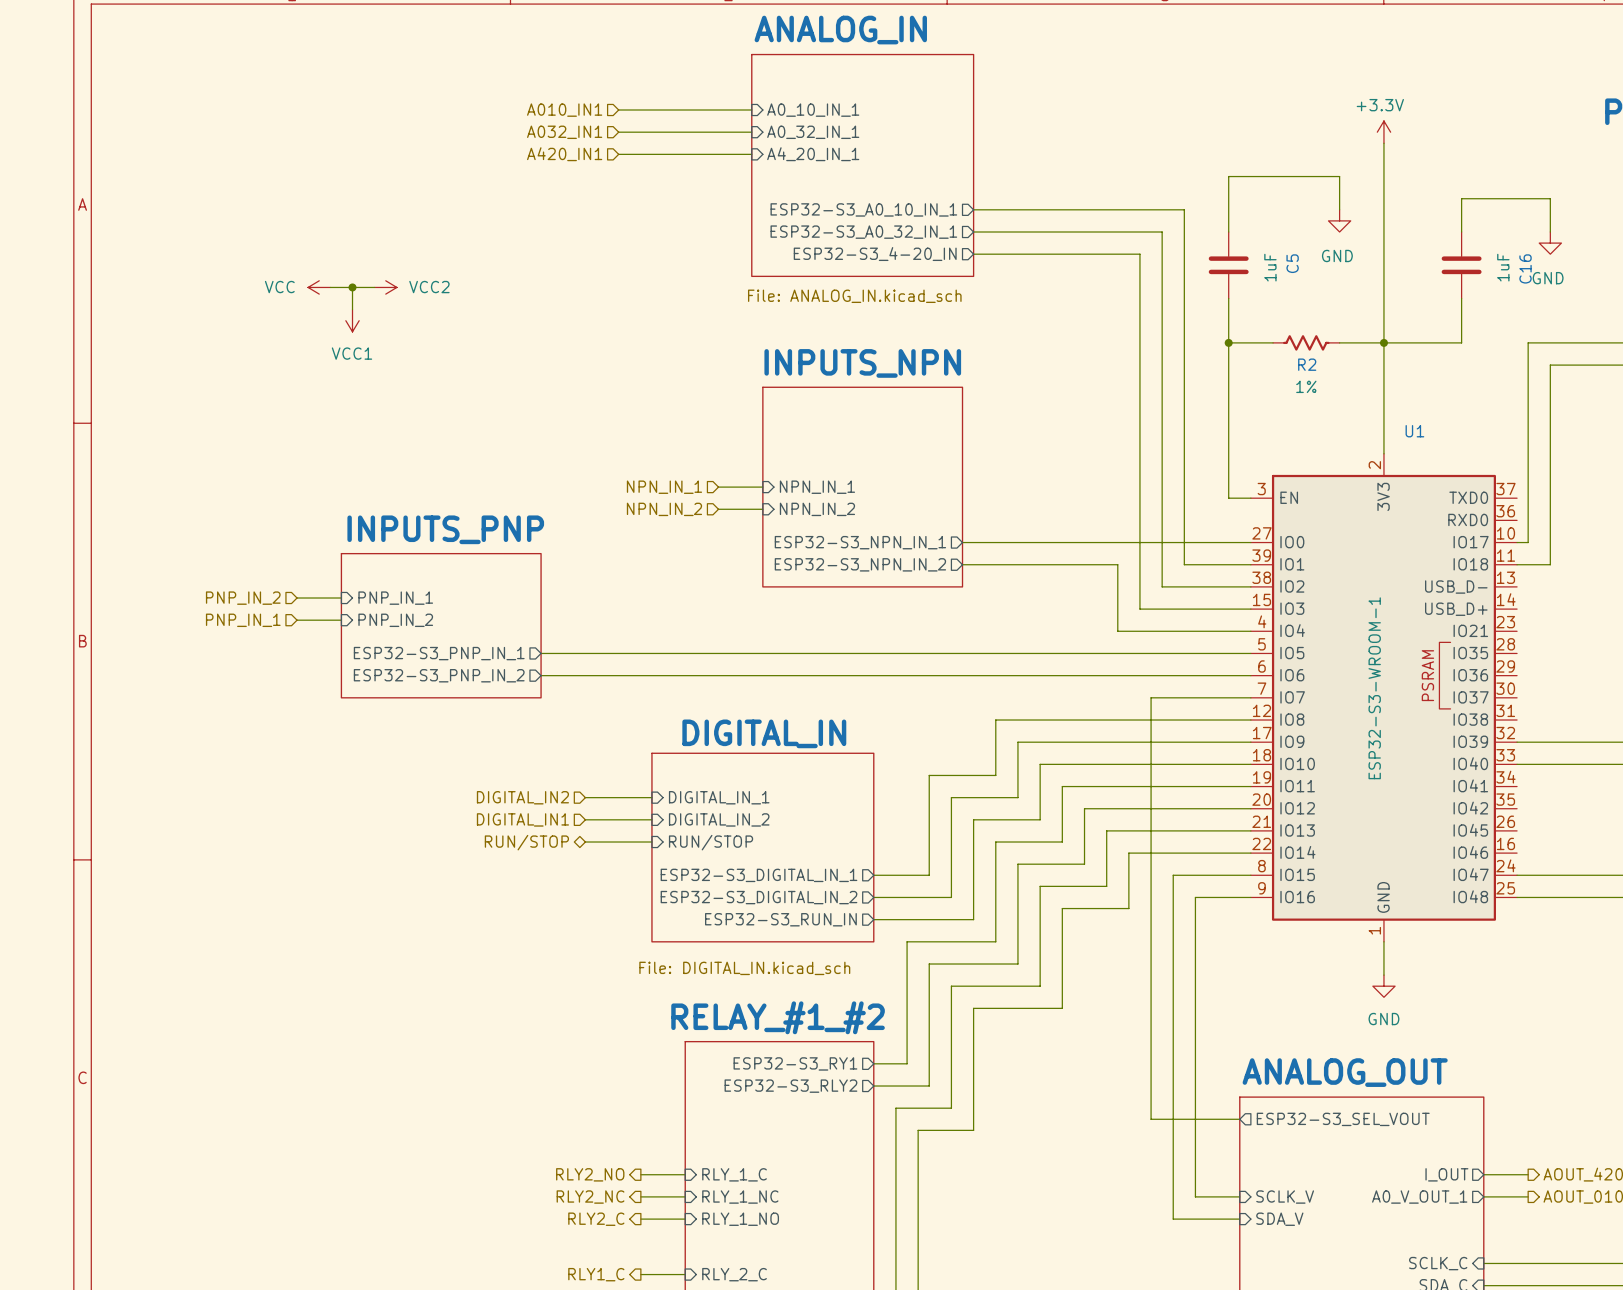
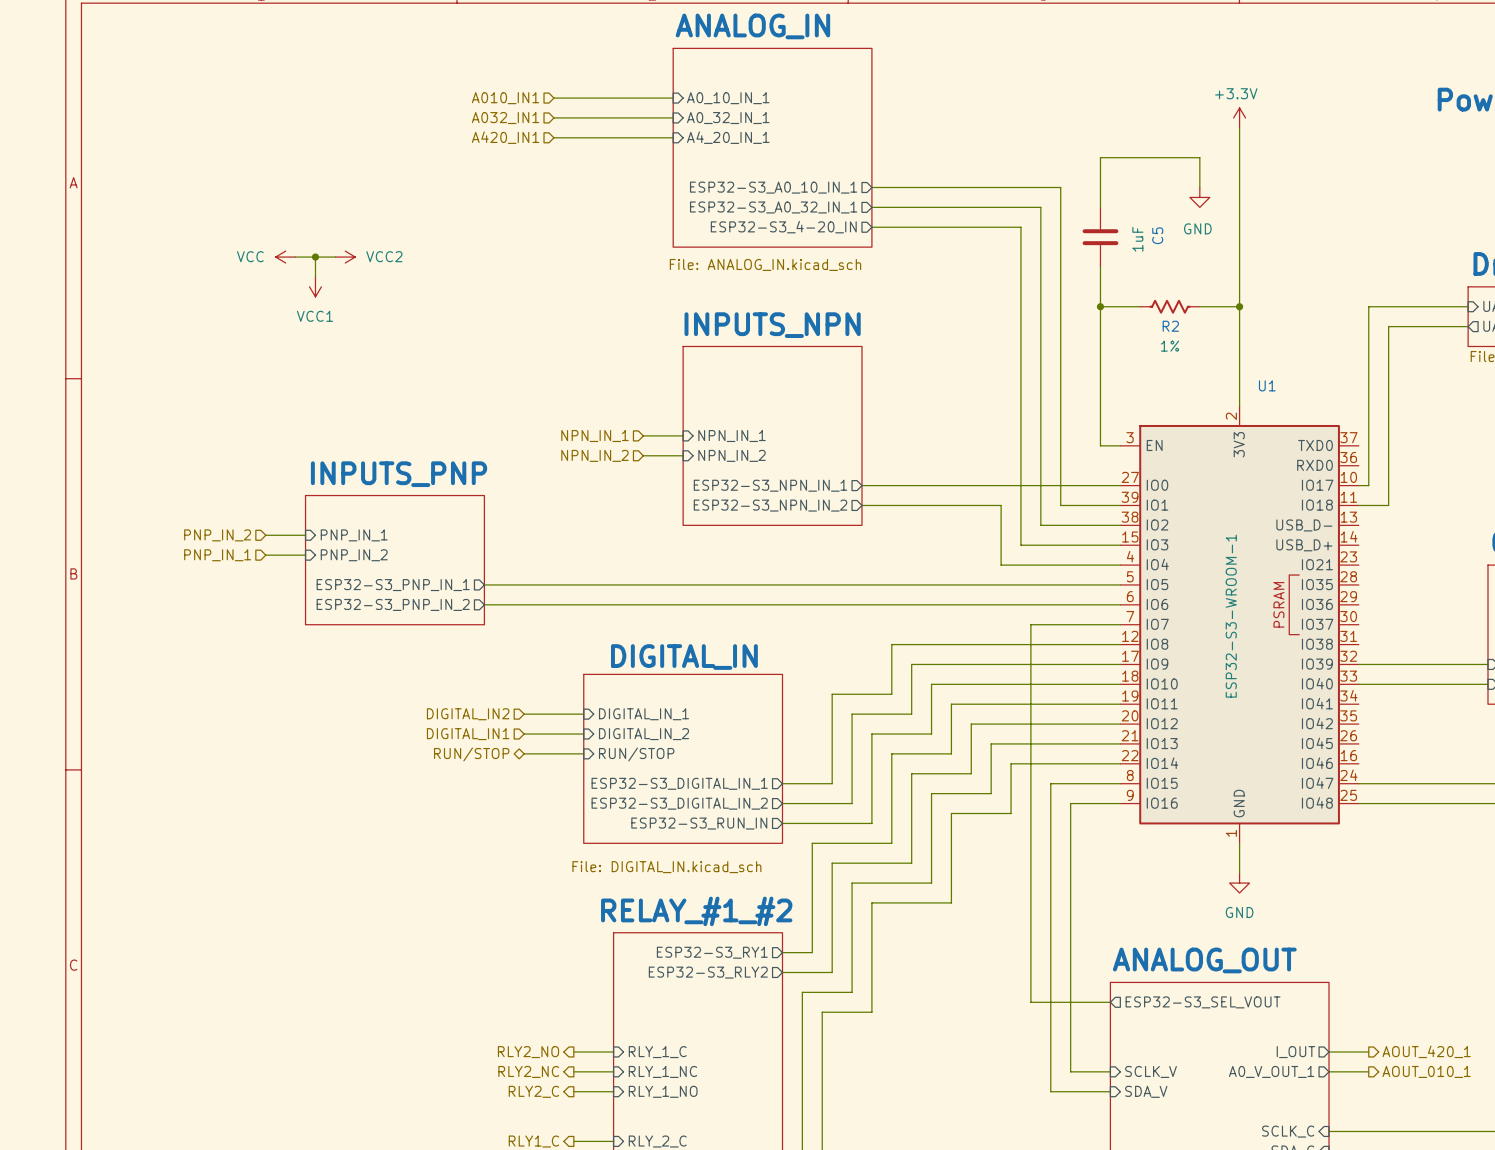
wire: (1461, 232) (1461, 198) (1550, 198) (1550, 232) -> none
power symbol: GND (1550, 243) -> none
C16: 1uF (1461, 265) -> none
wire: (1461, 298) (1461, 342) (1383, 342) -> none

